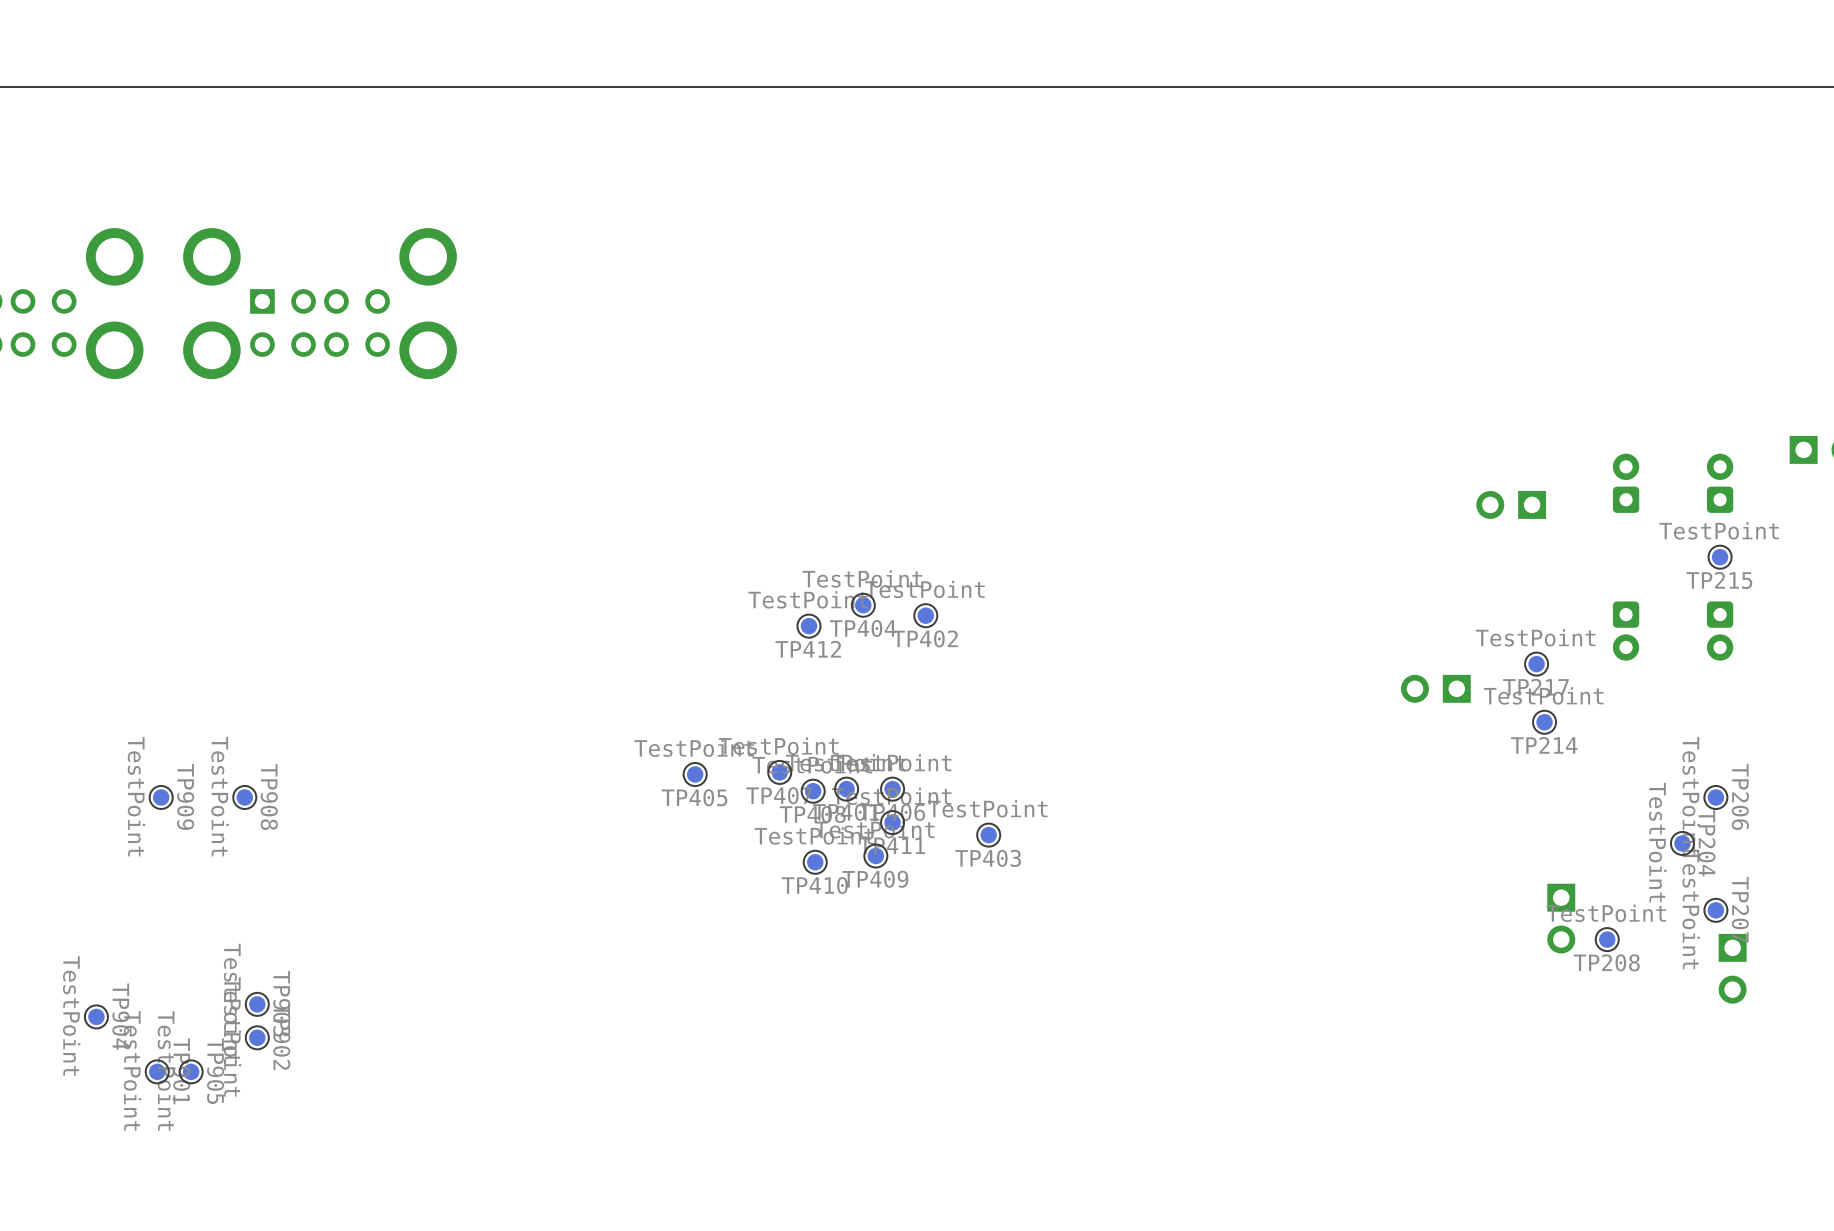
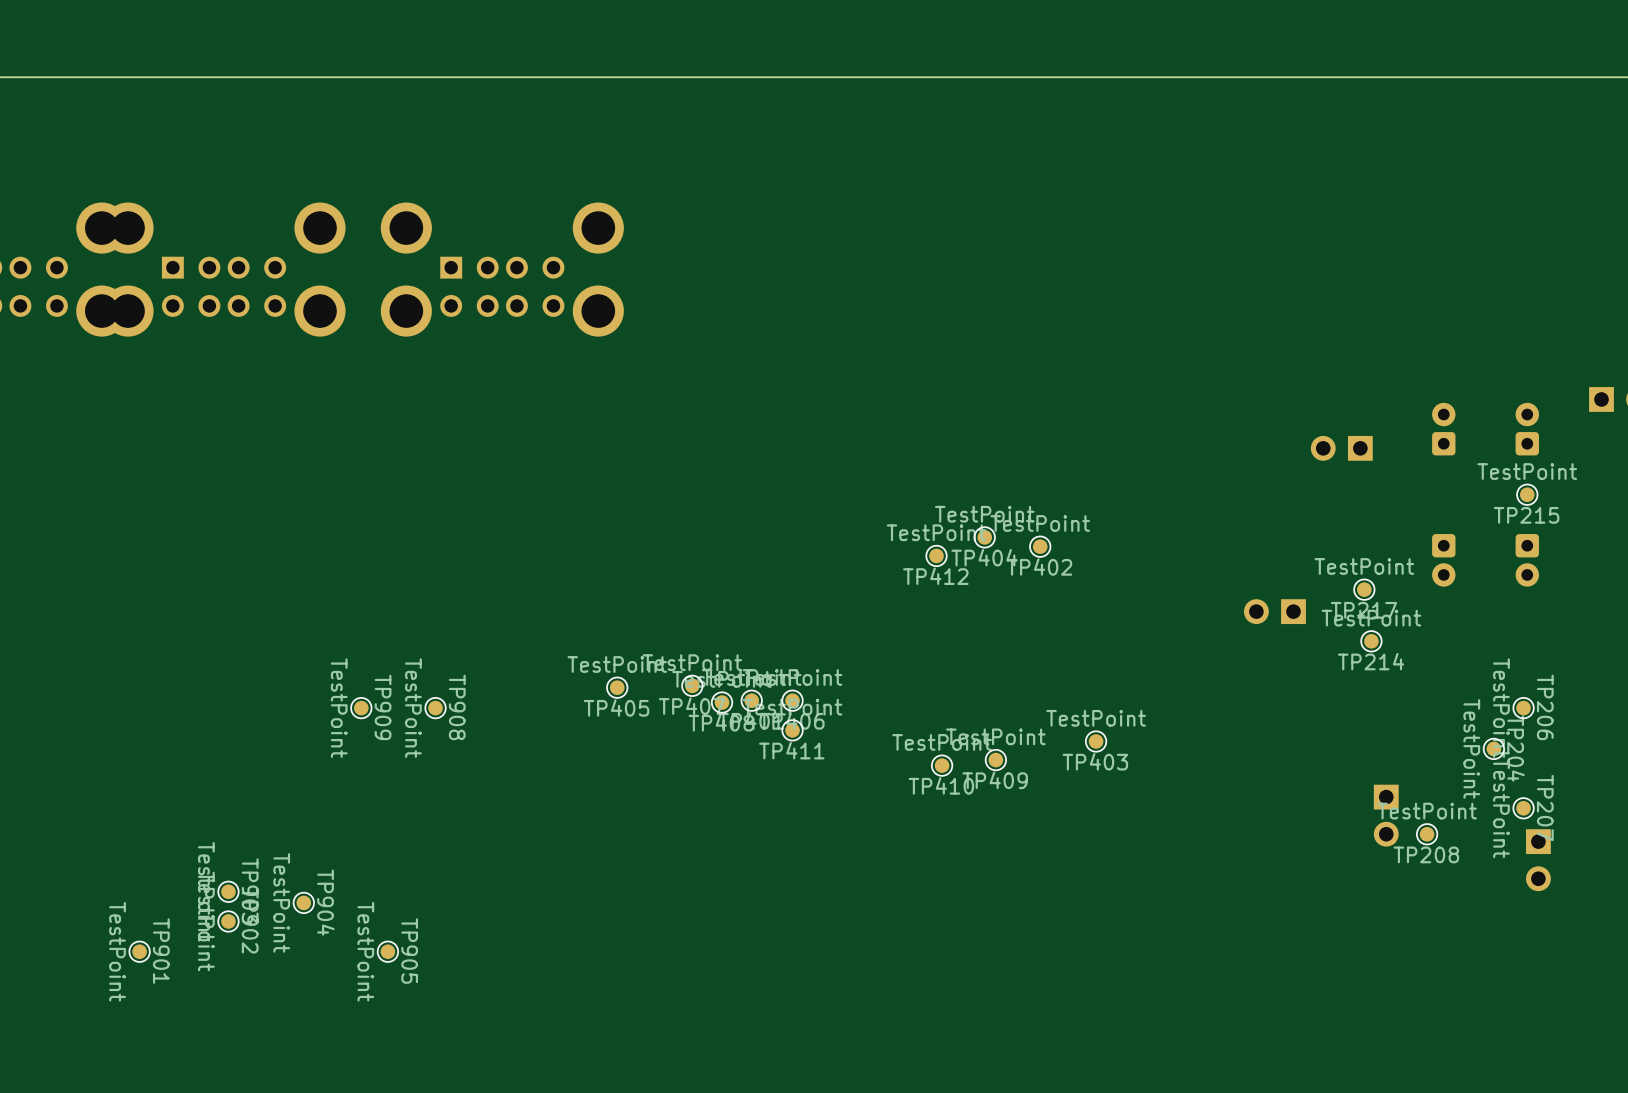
part position: (320, 303) -> (224, 269)
part: none -> (502, 269)
TP404 position: (863, 605) -> (984, 537)
TP402 position: (925, 615) -> (1040, 546)
TP412 position: (808, 626) -> (936, 555)
TP909 position: (161, 797) -> (361, 708)
TP908 position: (244, 797) -> (435, 708)
TP403 position: (988, 835) -> (1096, 741)
TP409 position: (875, 856) -> (995, 760)
TP410 position: (815, 862) -> (942, 765)
TP904 position: (96, 1016) -> (303, 902)
TP905 position: (191, 1071) -> (387, 951)

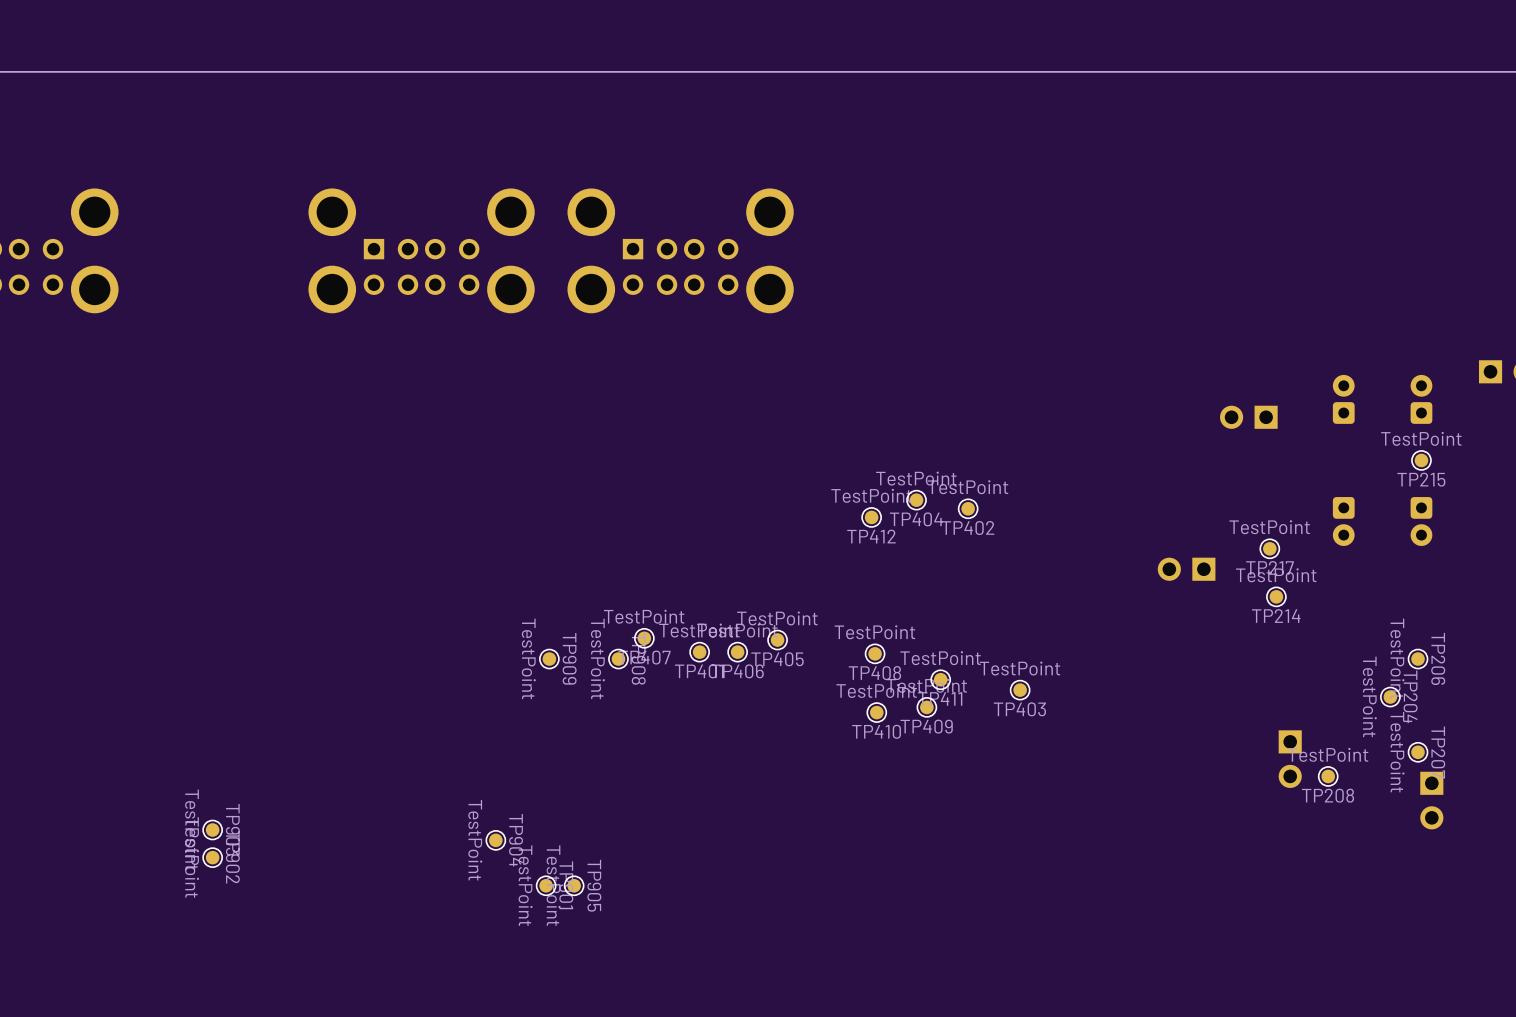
part: (224, 269) -> none
part position: (502, 269) -> (421, 250)
part: none -> (680, 250)
TP405 position: (617, 687) -> (777, 640)
TP408 position: (722, 702) -> (875, 653)
TP909 position: (361, 708) -> (549, 659)
TP908 position: (435, 708) -> (618, 659)
TP411 position: (792, 730) -> (940, 679)
TP904 position: (303, 902) -> (495, 840)
TP901 position: (139, 951) -> (546, 885)
TP905 position: (387, 951) -> (574, 885)

